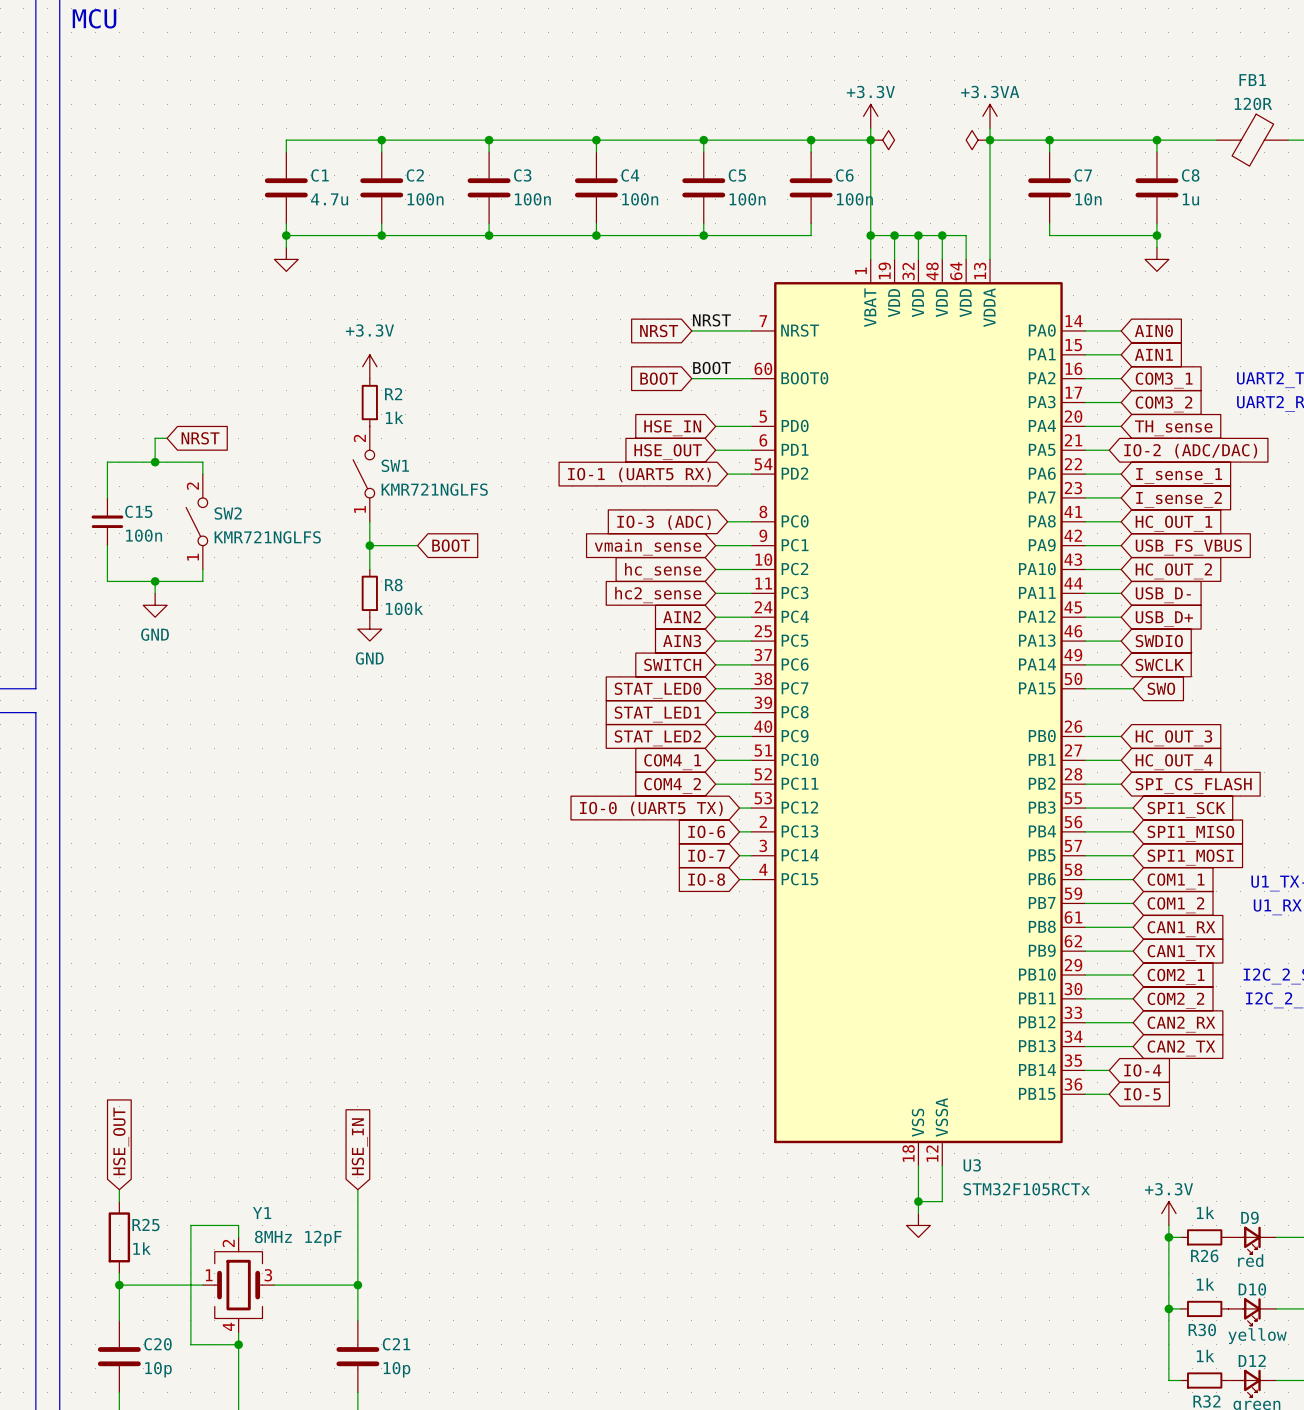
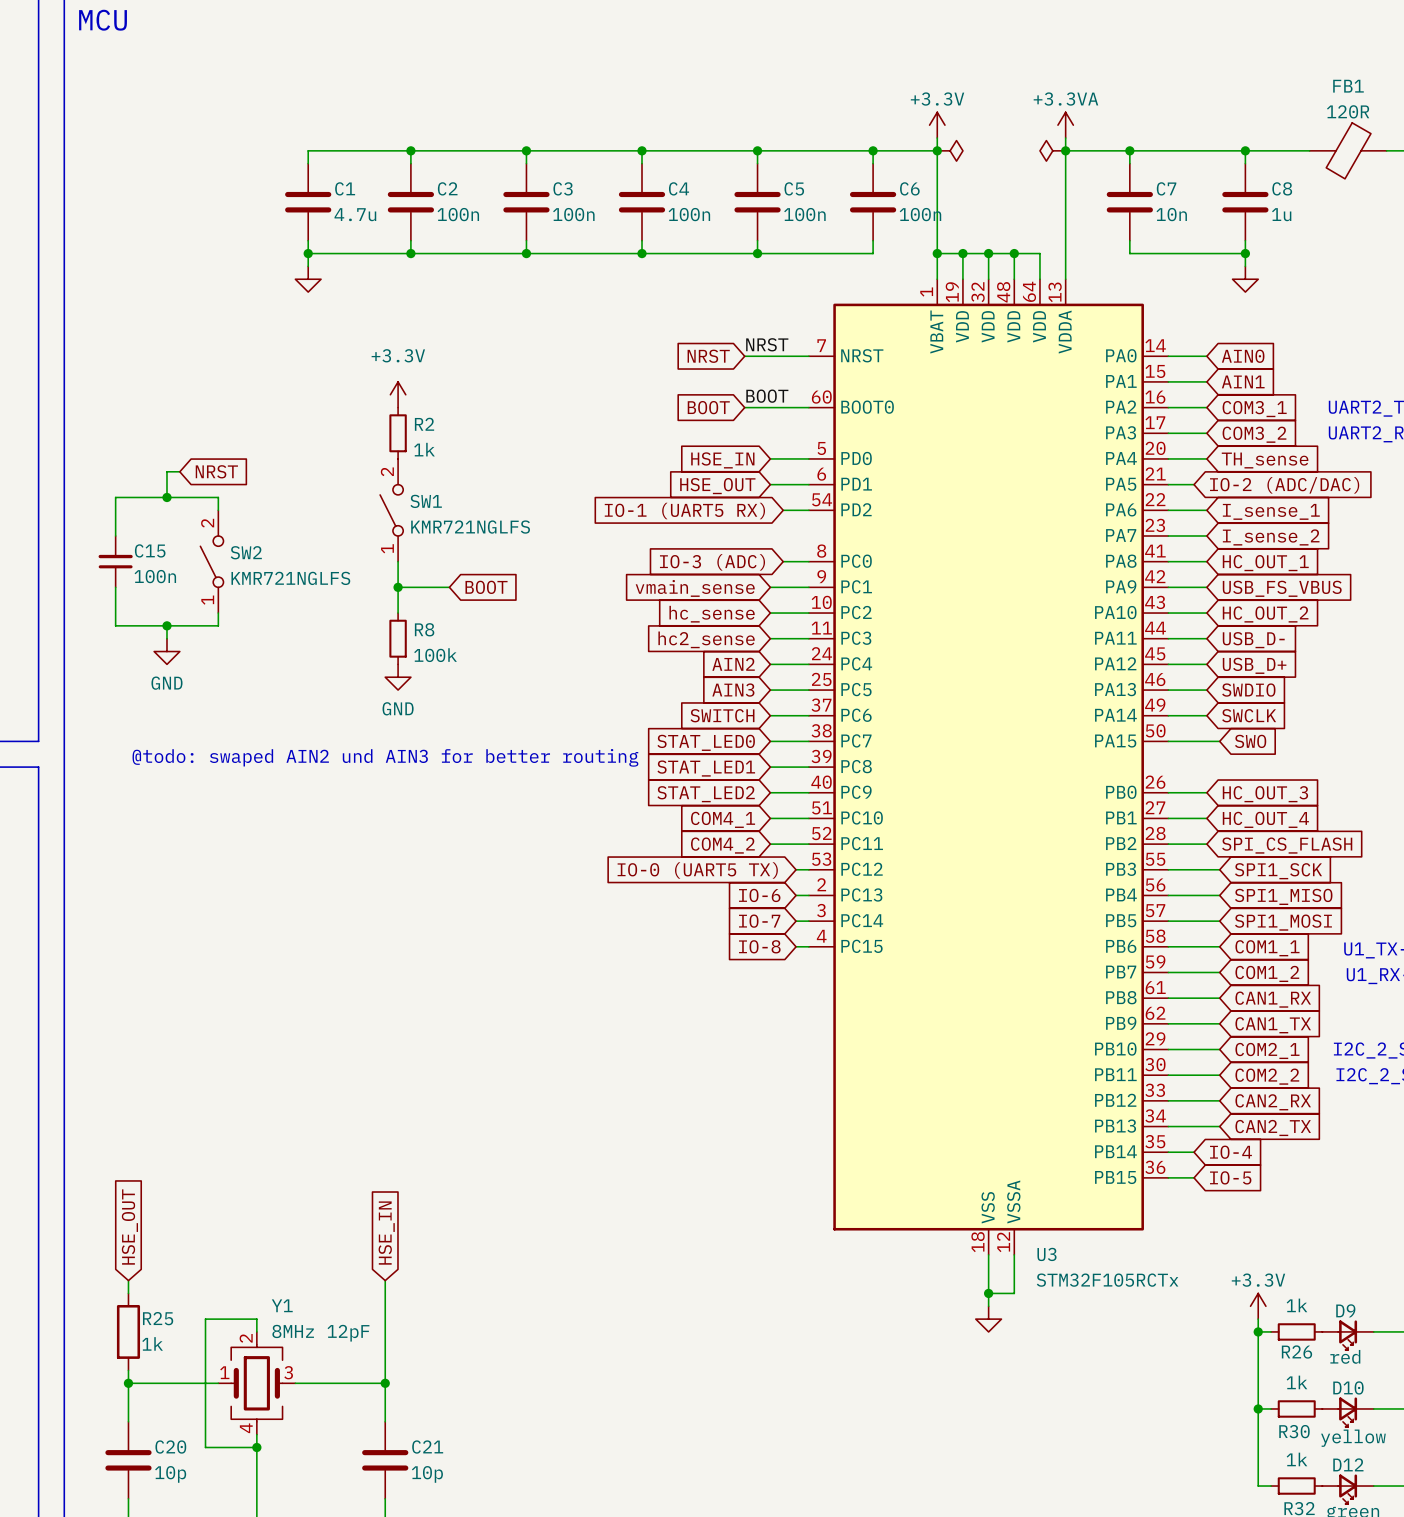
text: none -> @todo: swaped AIN2 und AIN3 for better routing (385, 757)

